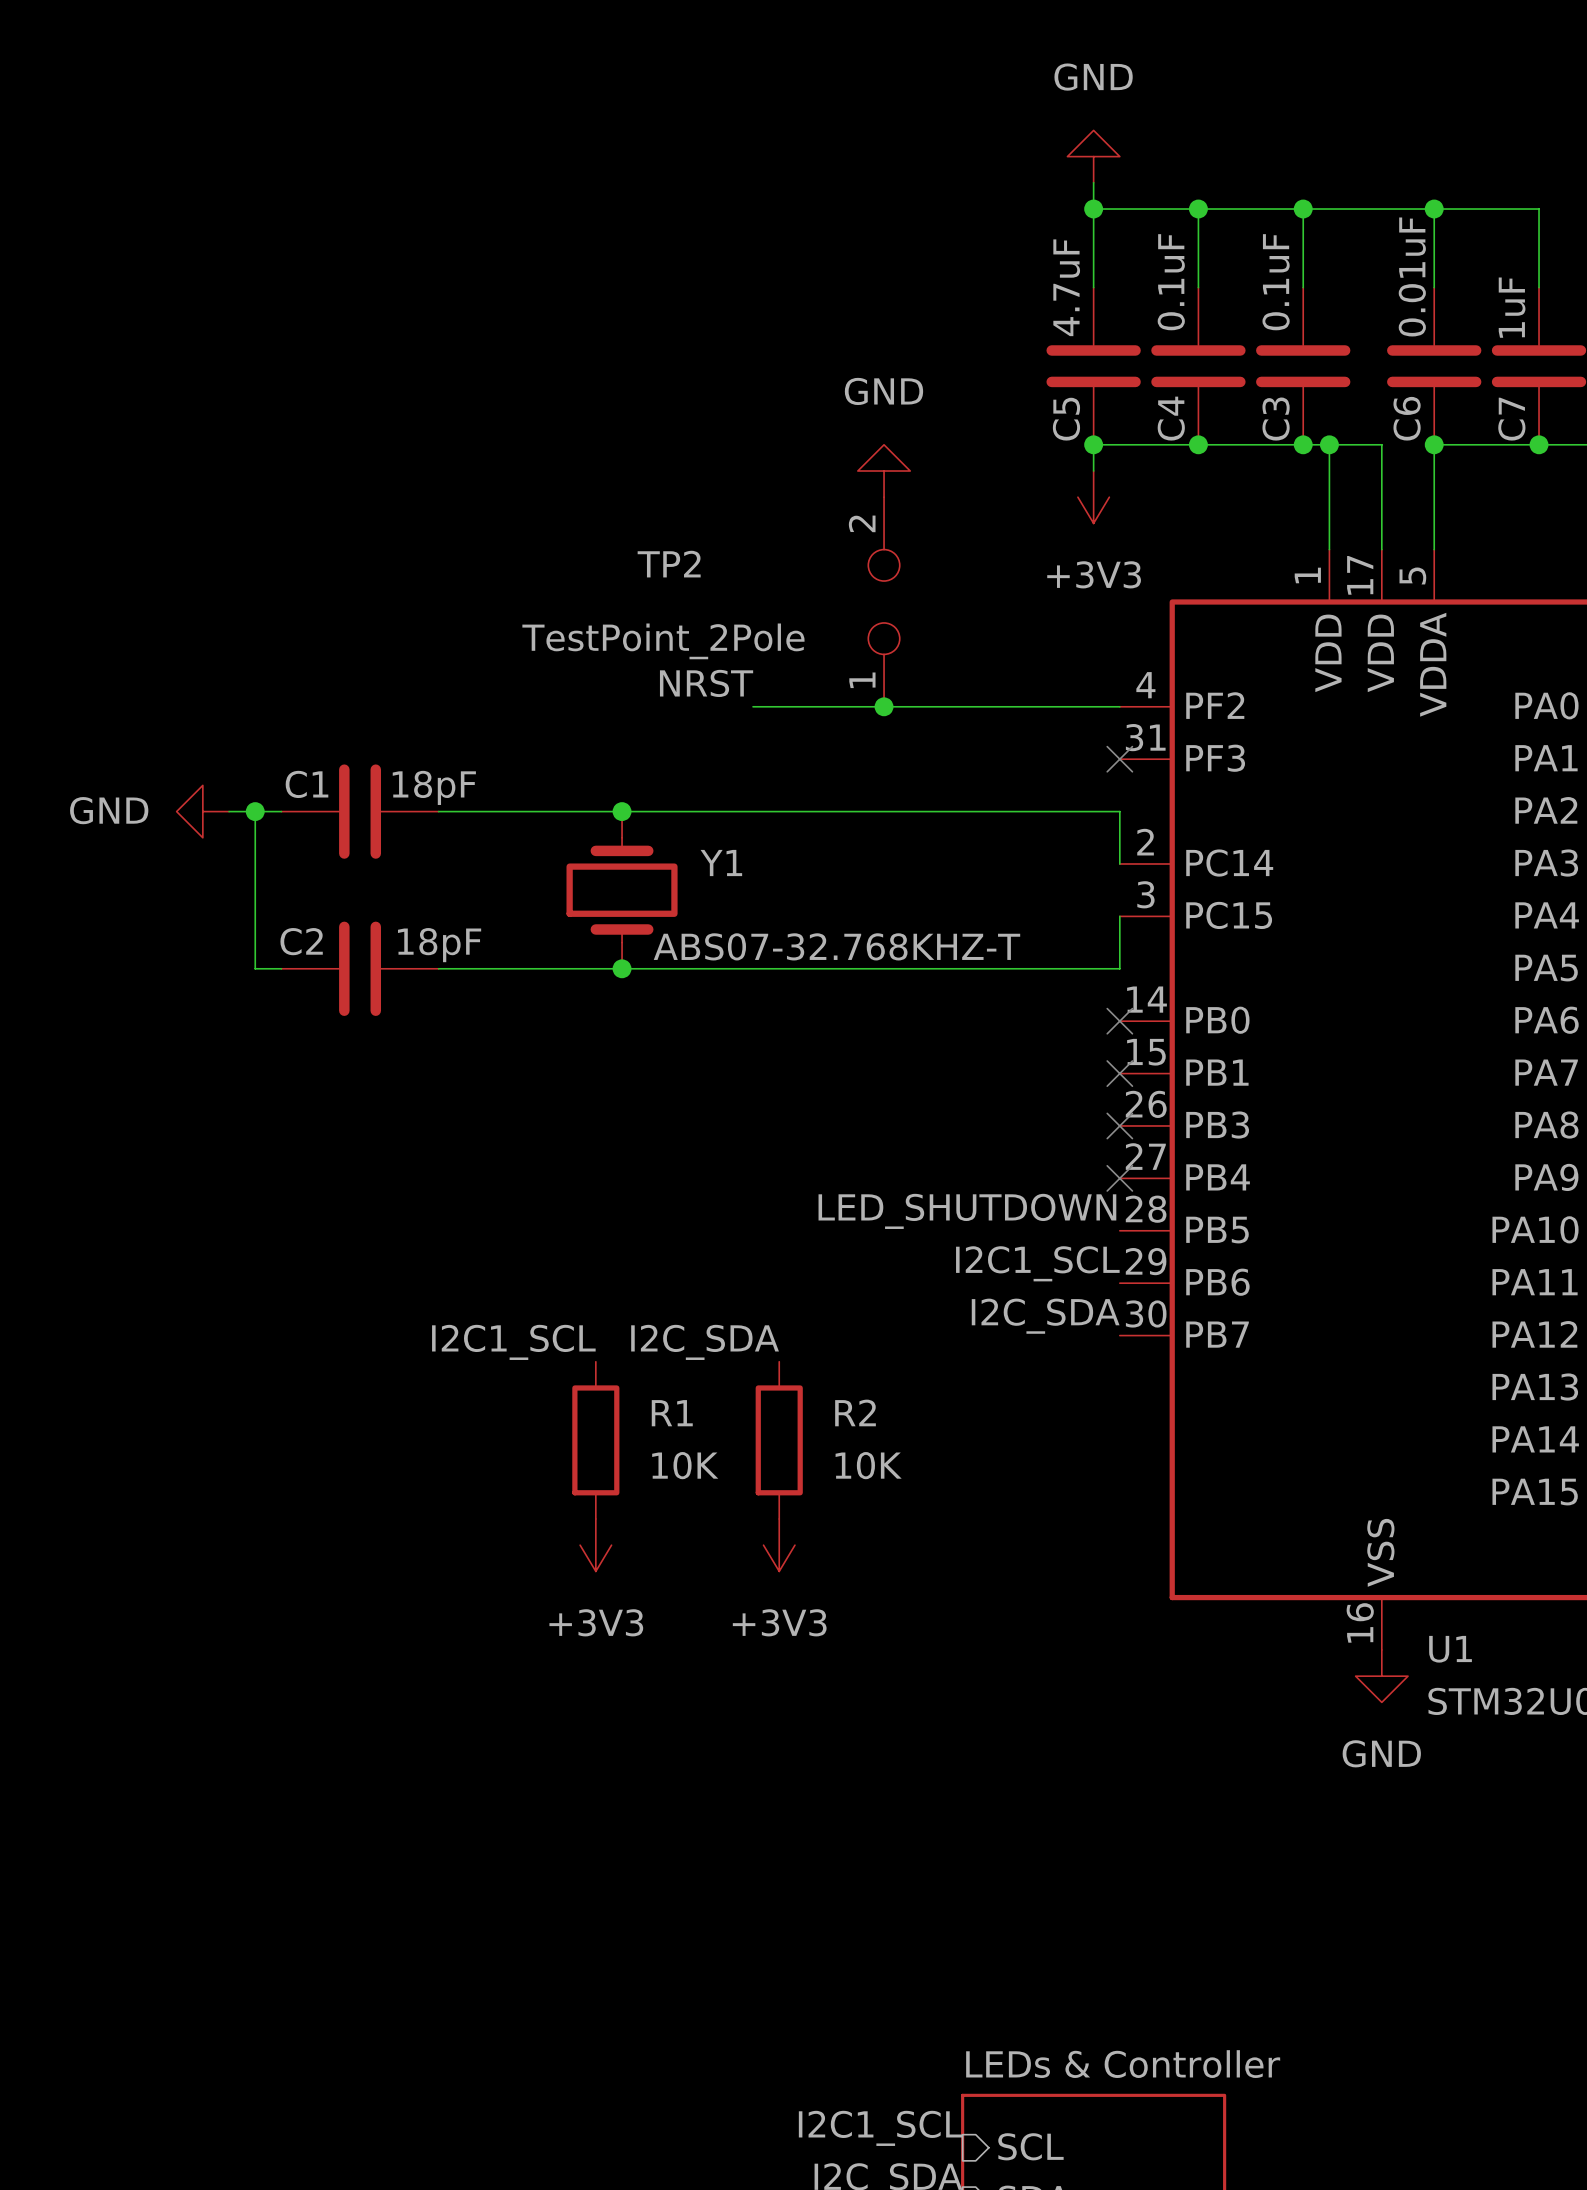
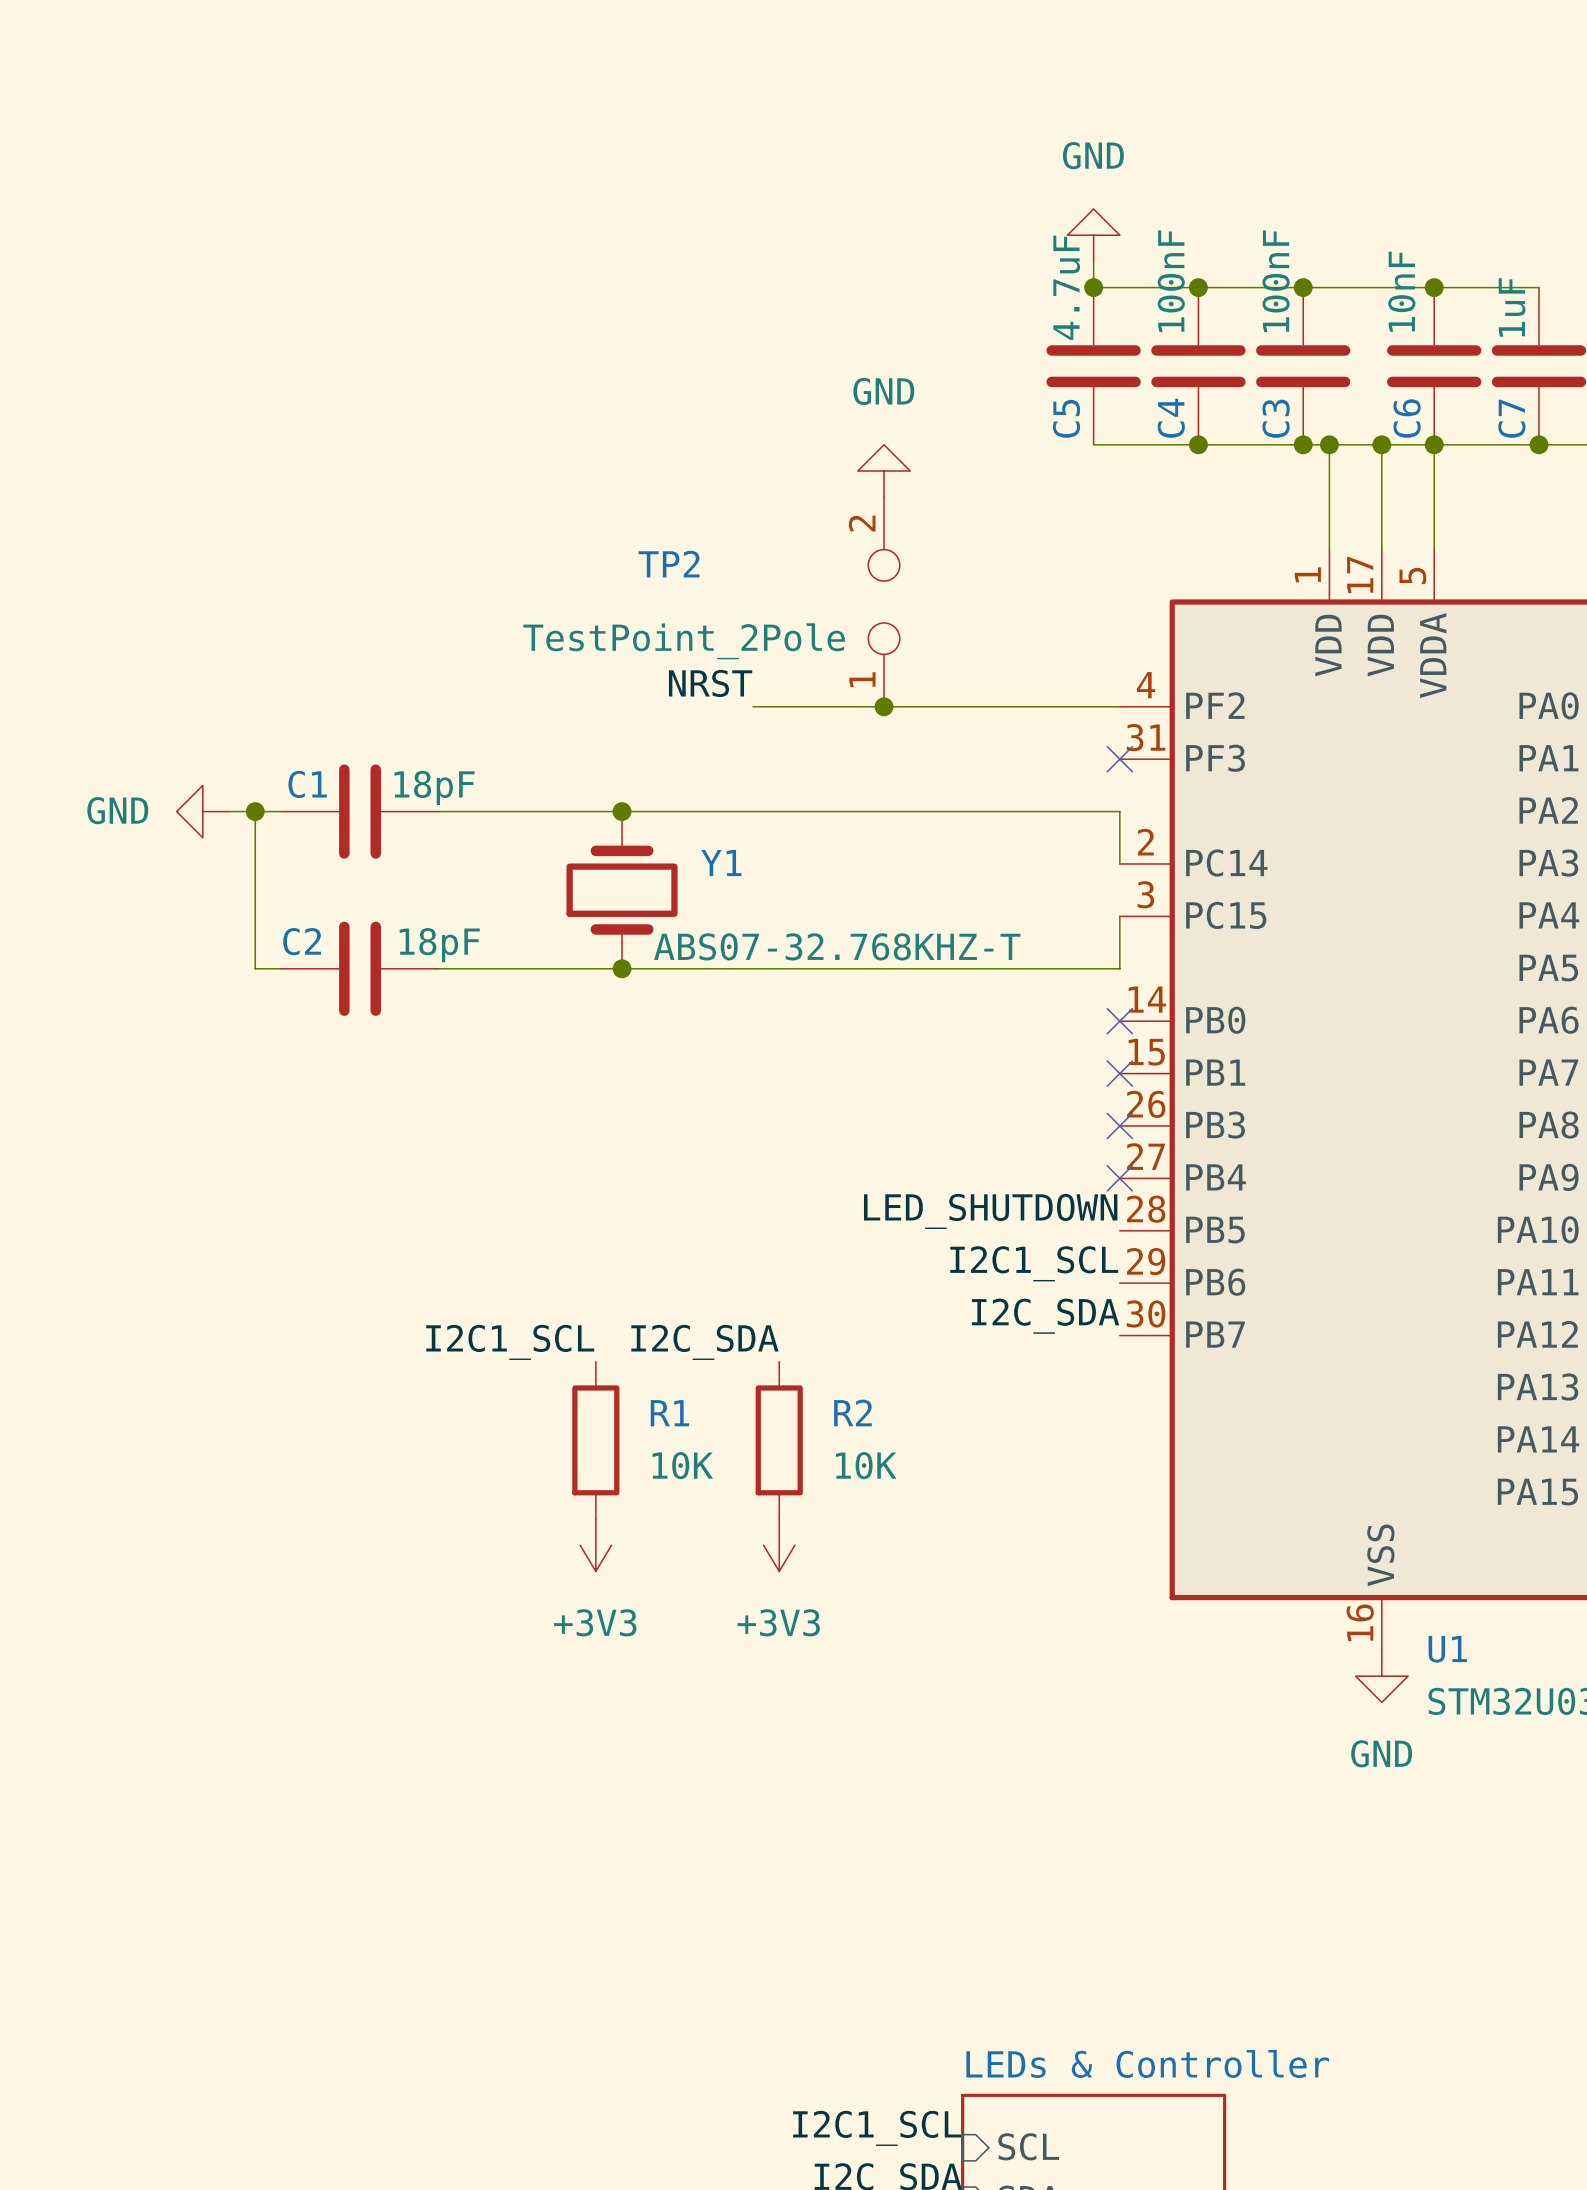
power symbol position: GND (1093, 156) -> GND (1093, 235)
wire: (1093, 182) (1093, 261) -> none
wire: (1093, 209) (1539, 209) (1539, 287) -> (1093, 287) (1539, 287)
junction: (1093, 209) -> none
wire: (1198, 209) (1198, 287) -> none
junction: (1198, 209) -> none
wire: (1303, 209) (1303, 287) -> none
junction: (1303, 209) -> none
wire: (1434, 209) (1434, 287) -> none
junction: (1434, 209) -> none
C6 value: 0.01uF (1412, 276) -> 10nF (1401, 291)
C4 value: 0.1uF (1171, 282) -> 100nF (1171, 281)
C3 value: 0.1uF (1276, 282) -> 100nF (1276, 281)
junction: none -> (1093, 287)
junction: none -> (1198, 287)
junction: none -> (1303, 287)
junction: none -> (1434, 287)
wire: (1093, 444) (1093, 471) -> none
junction: (1093, 444) -> none
wire: none -> (1381, 444) (1434, 444)
junction: none -> (1381, 444)
power symbol: +3V3 (1093, 497) -> none

